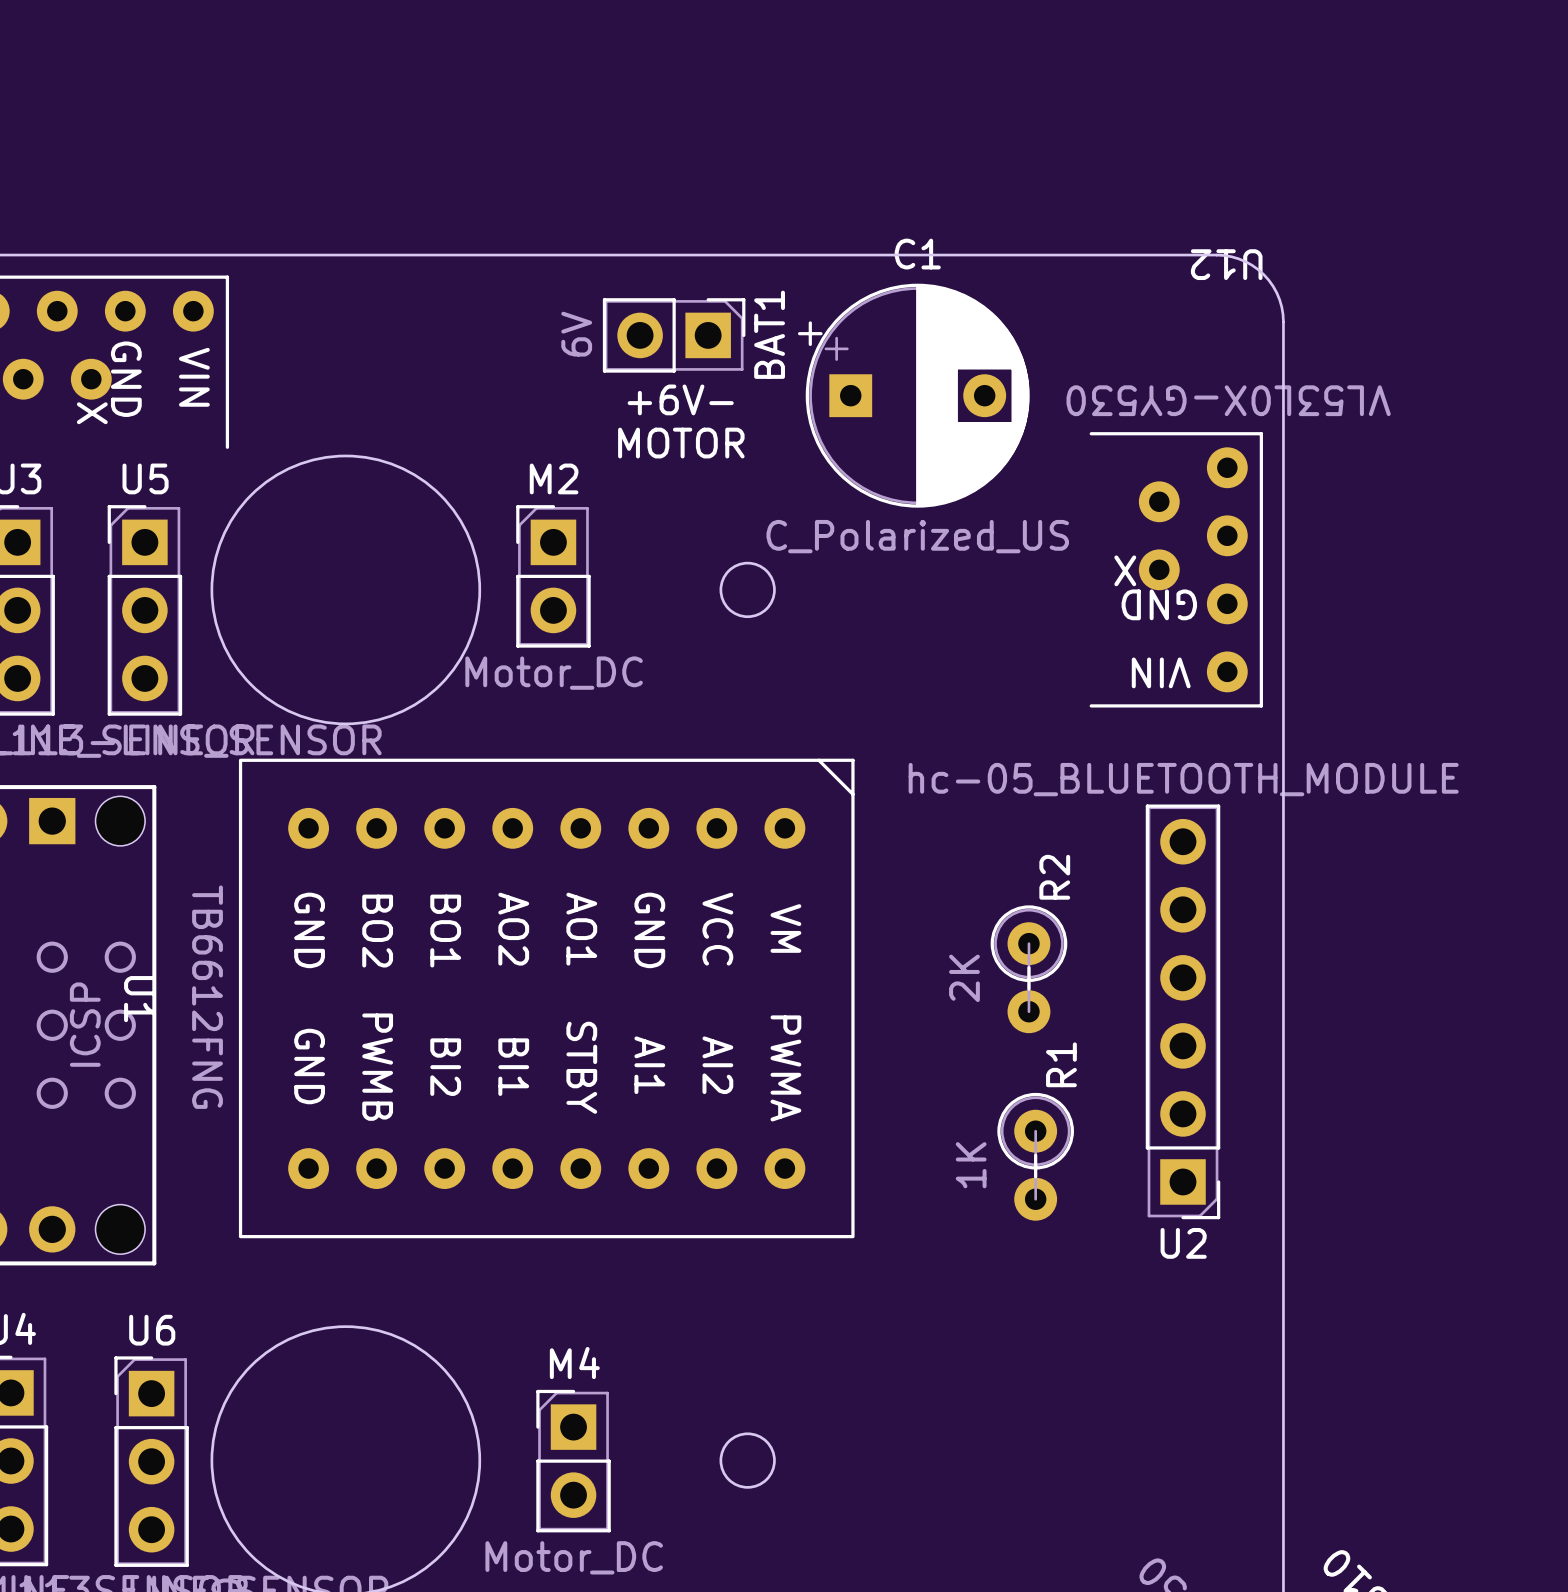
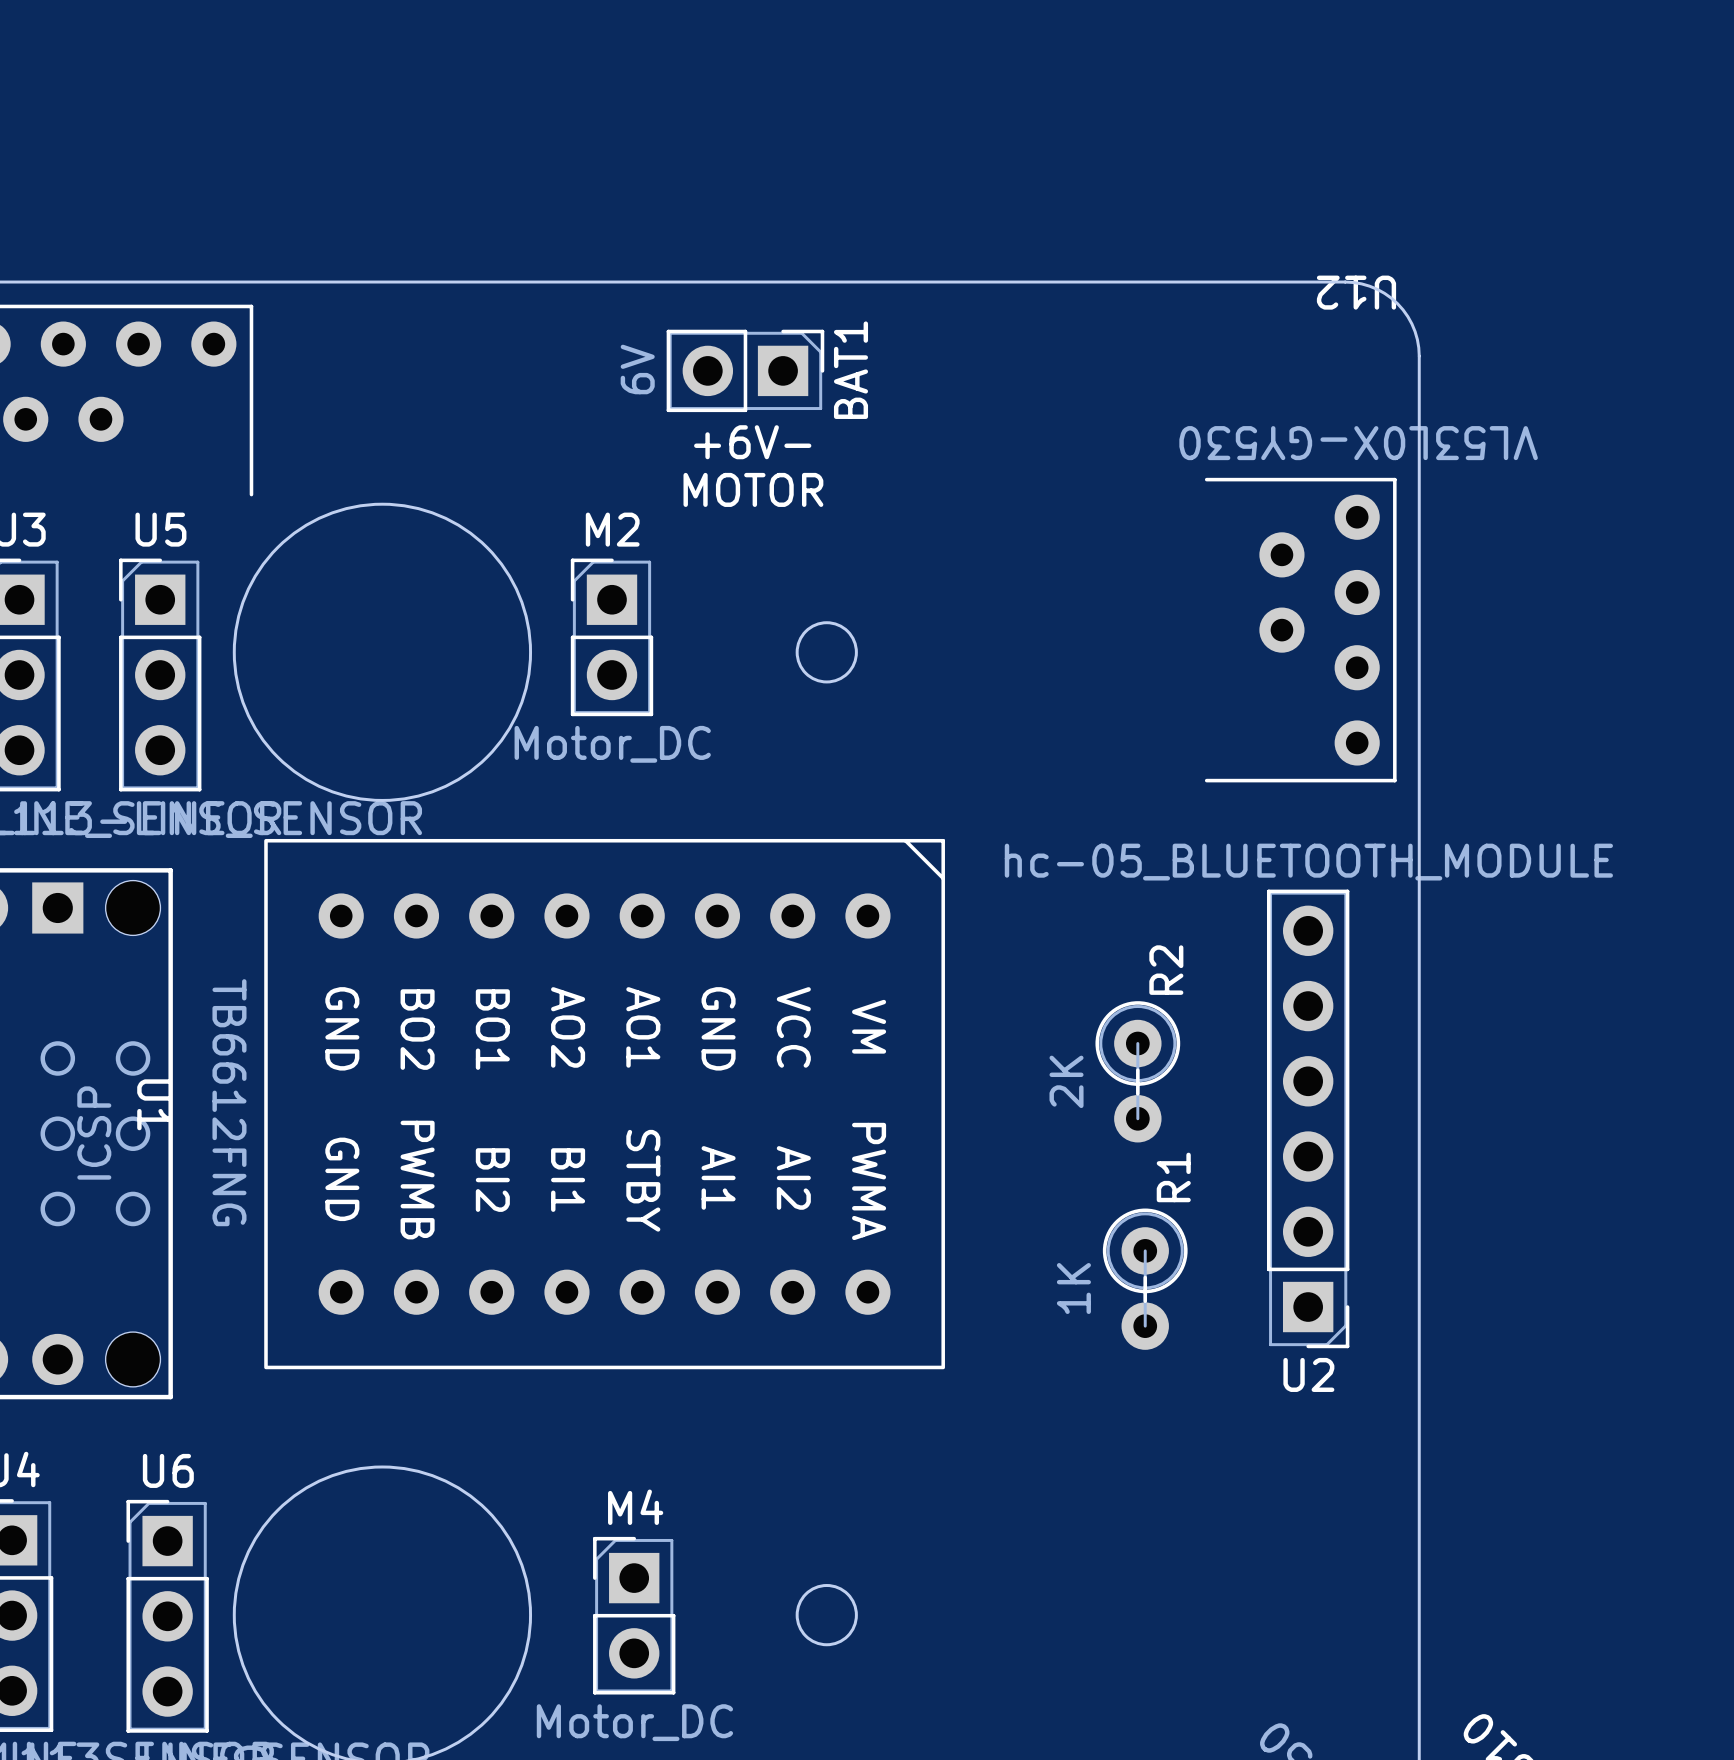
part text: VIN (194, 377) -> none
part text: GND (126, 379) -> none
C1: C_Polarized_US (913, 395) -> none
part text: X (92, 413) -> none
U12 text: X (1125, 570) -> none
U12 text: GND (1159, 604) -> none
U12 text: VIN (1161, 672) -> none

